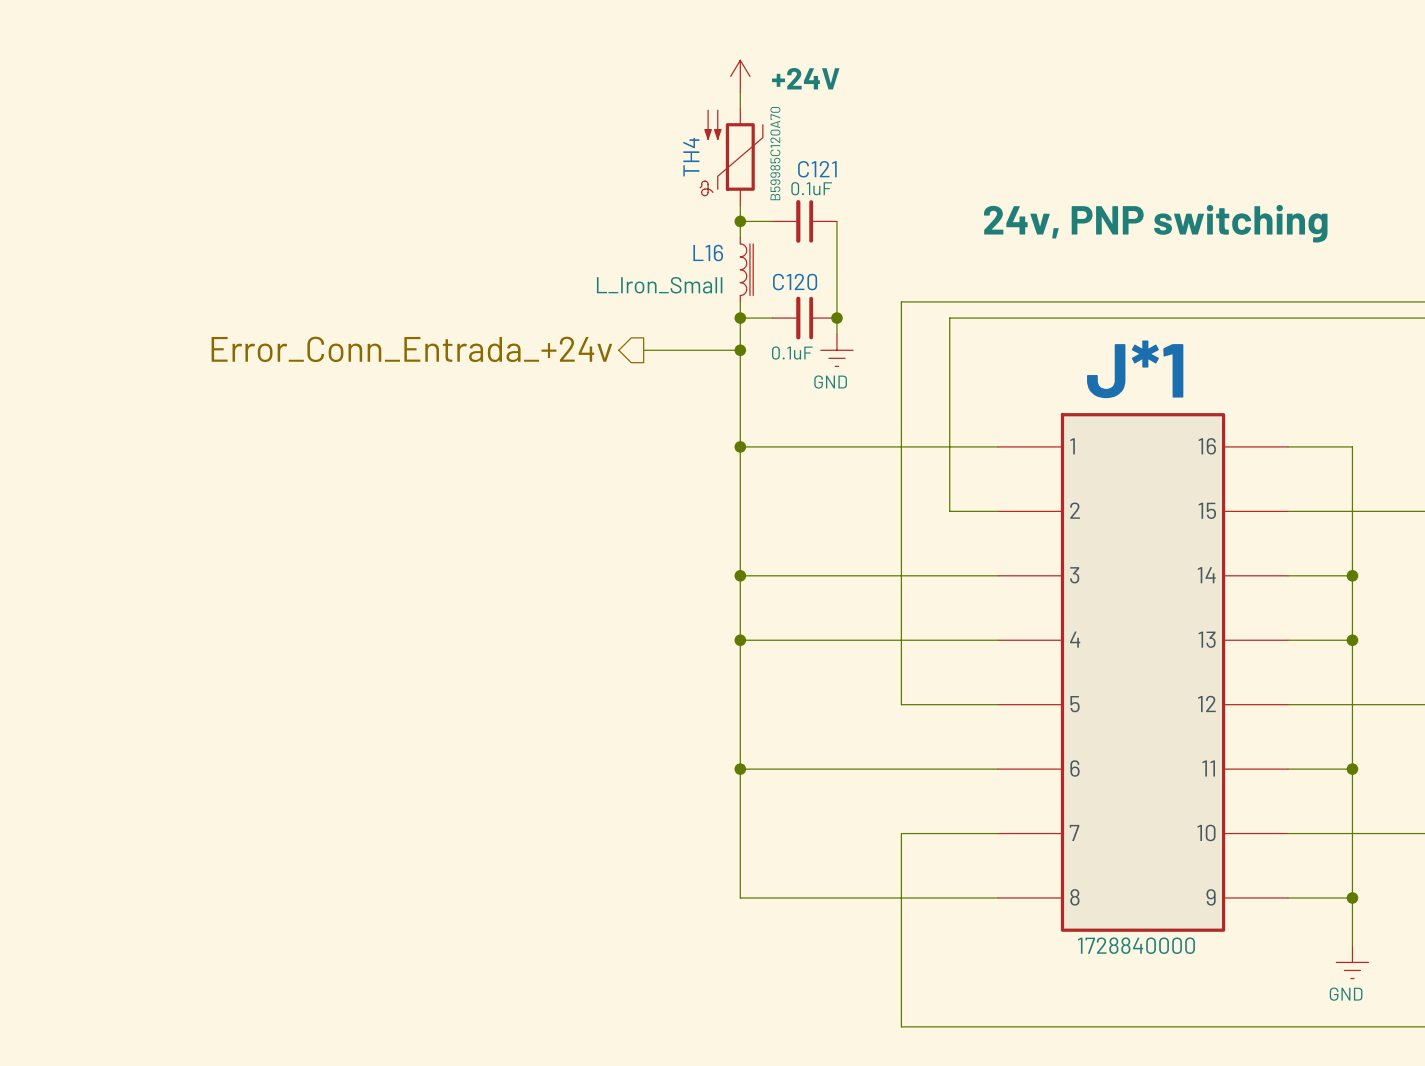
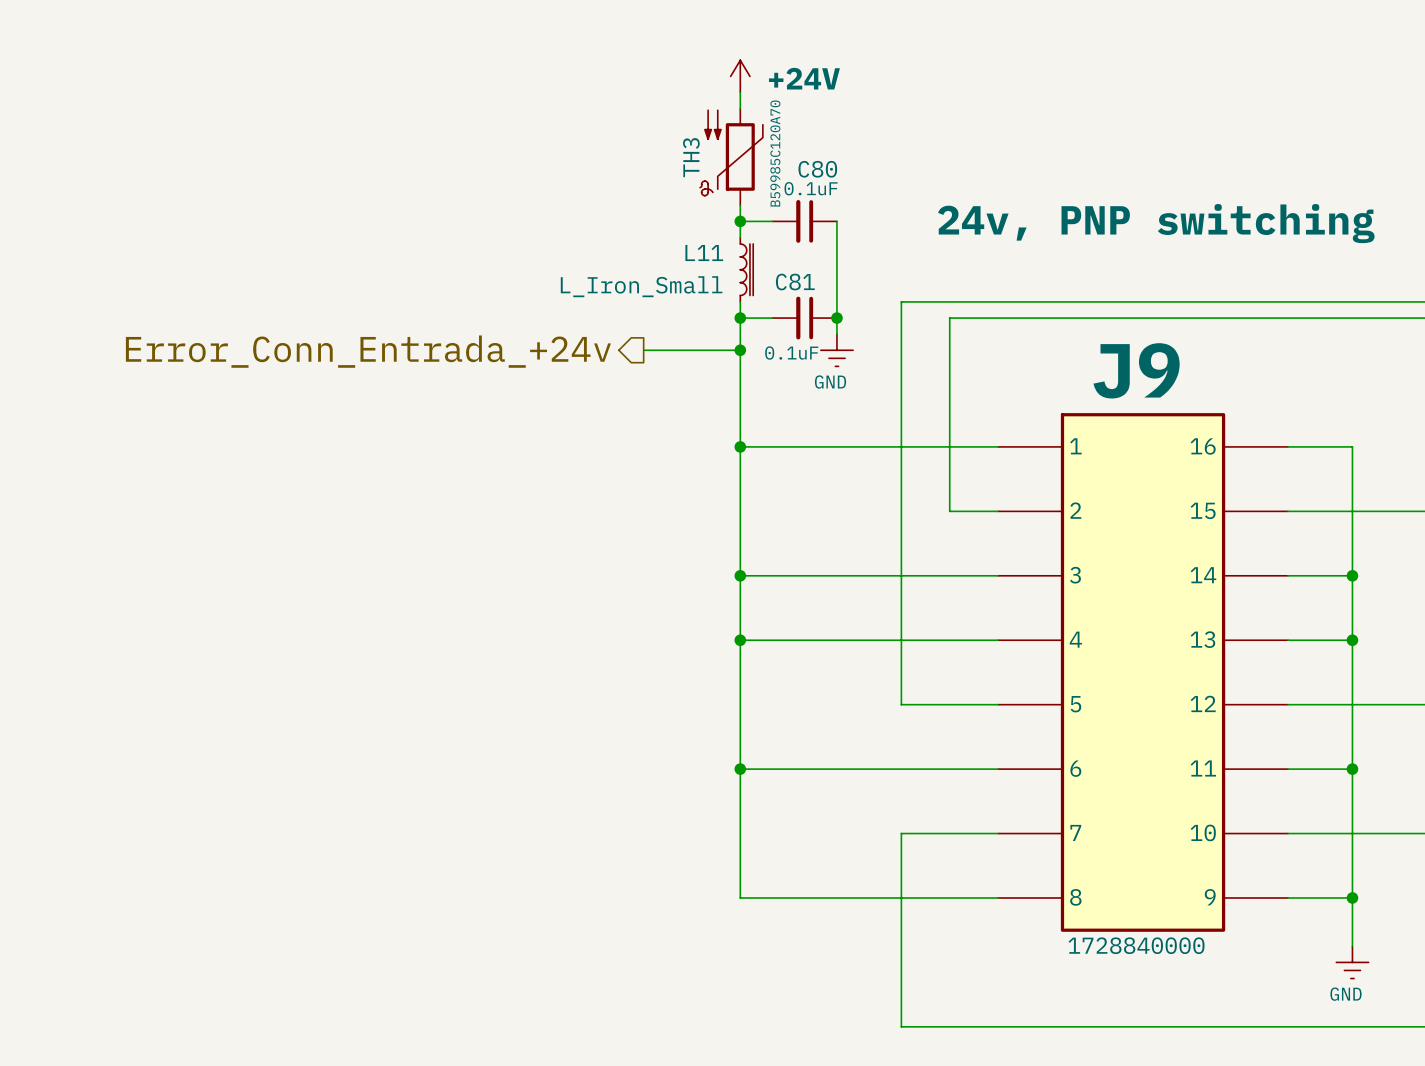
TH4 name: TH4 (691, 157) -> TH3 (691, 157)
C121 name: C121 (817, 169) -> C80 (817, 169)
L16 name: L16 (708, 253) -> L11 (704, 253)
C120 name: C120 (795, 282) -> C81 (795, 282)
J*1 name: J*1 (1135, 369) -> J9 (1136, 370)

